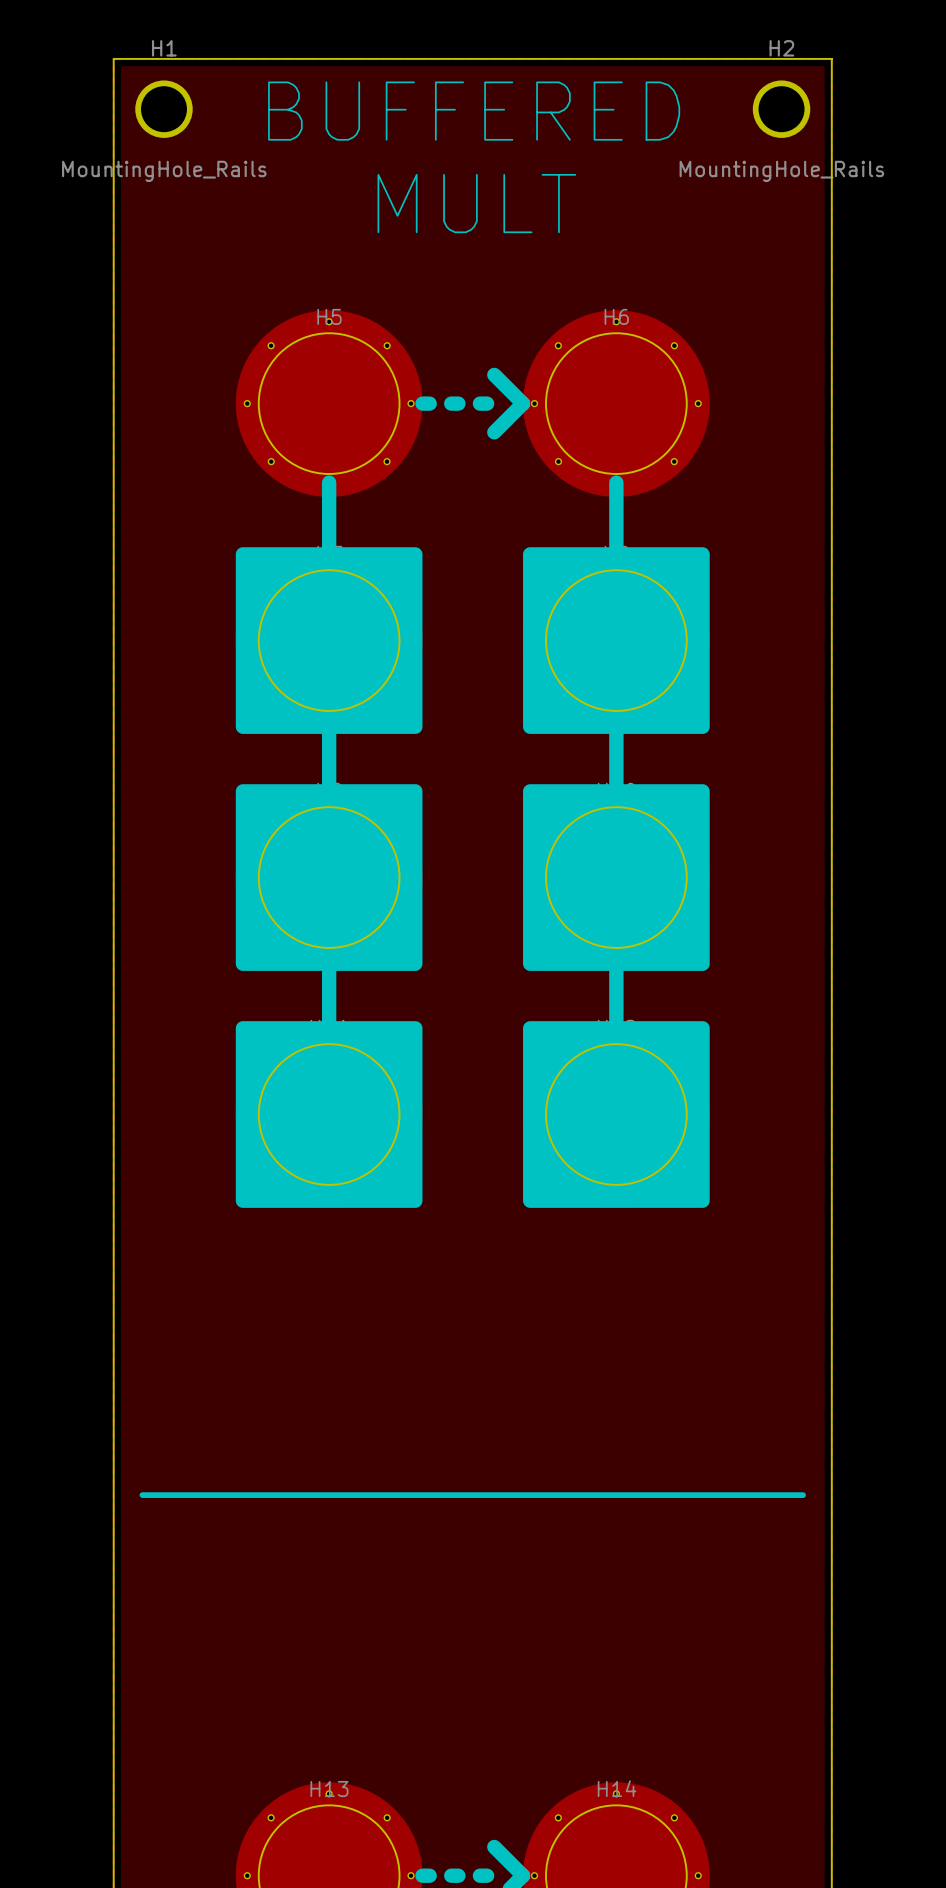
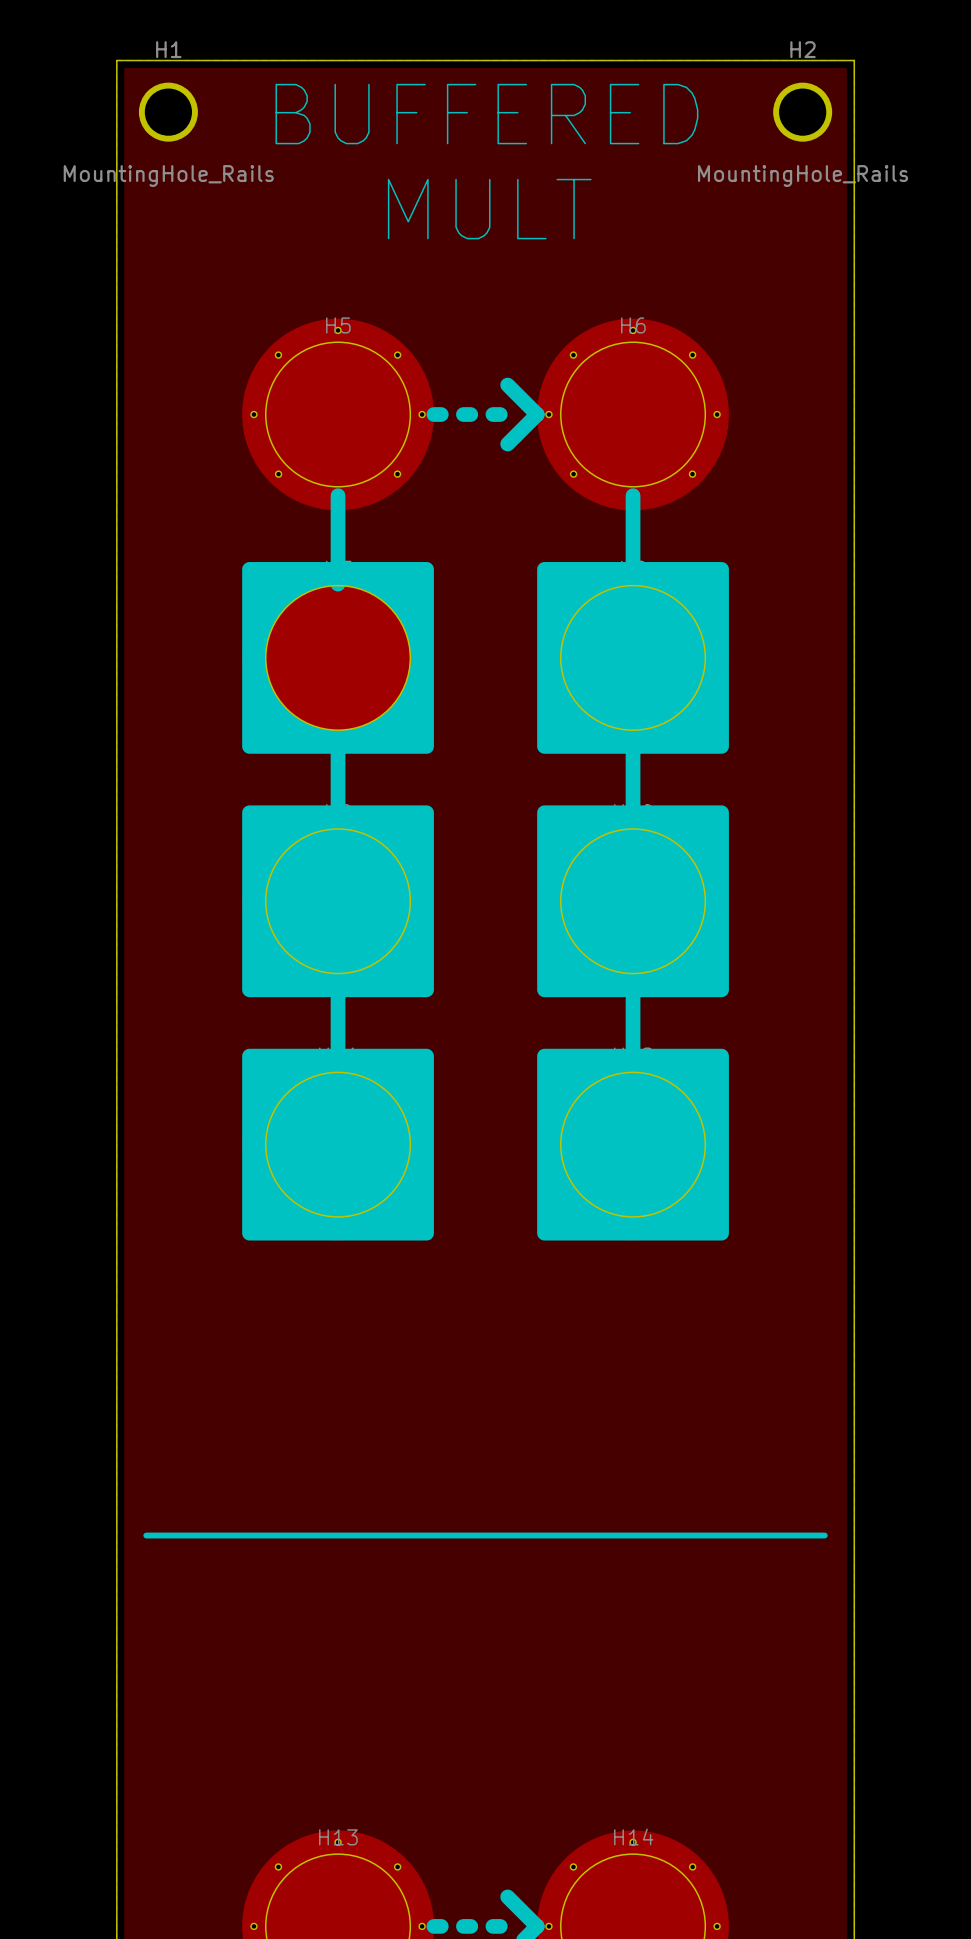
part footprint: [235, 547, 423, 734] -> [242, 562, 434, 754]

